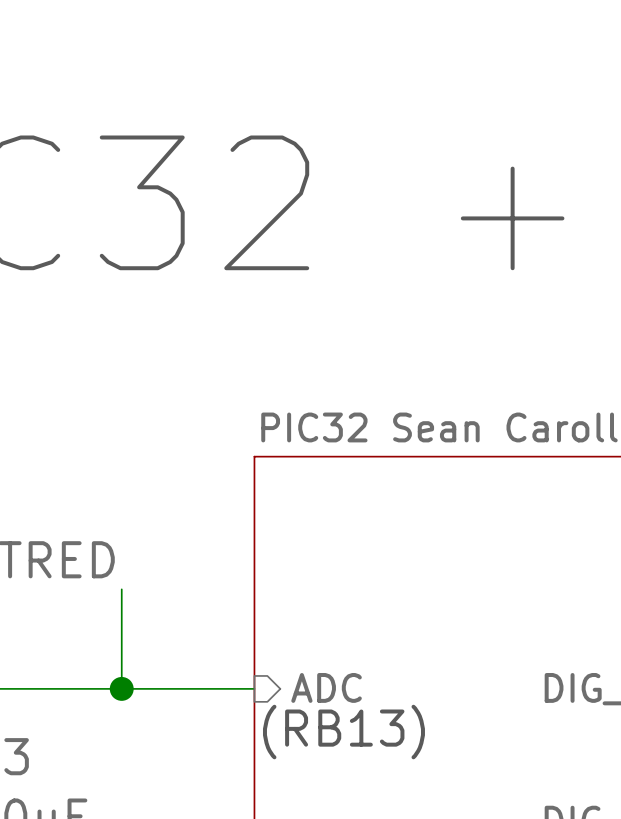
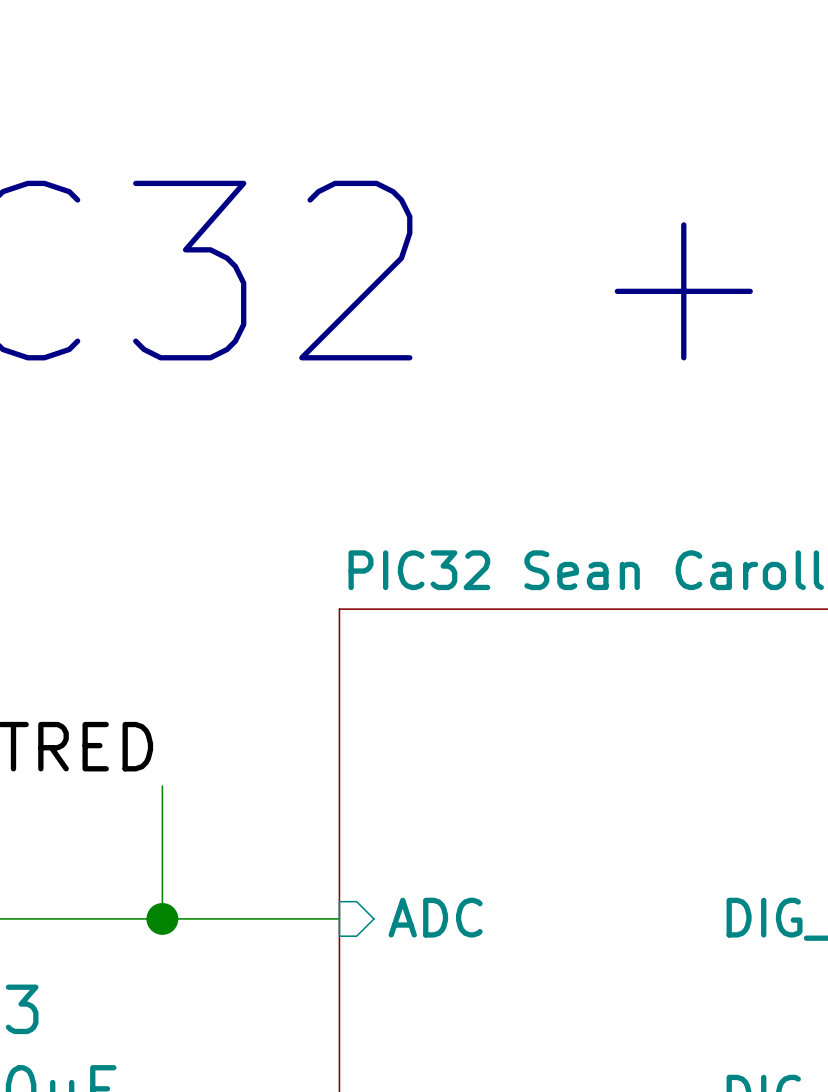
text: (RB13) (343, 732) -> none

